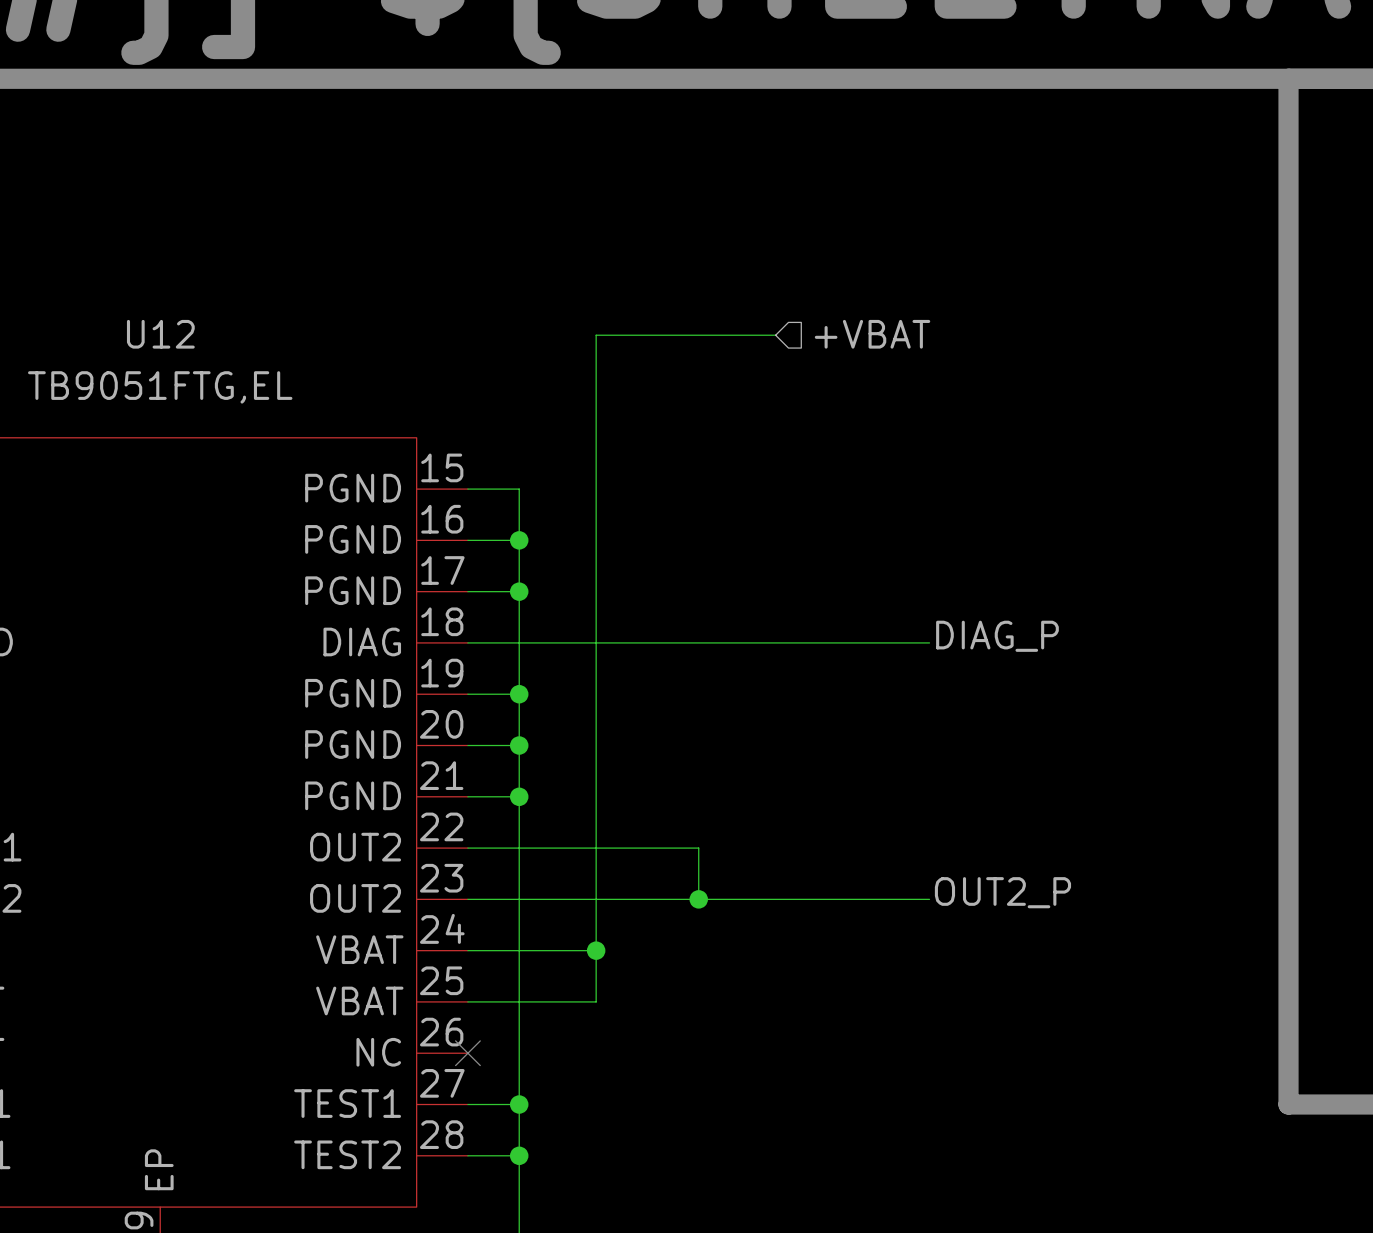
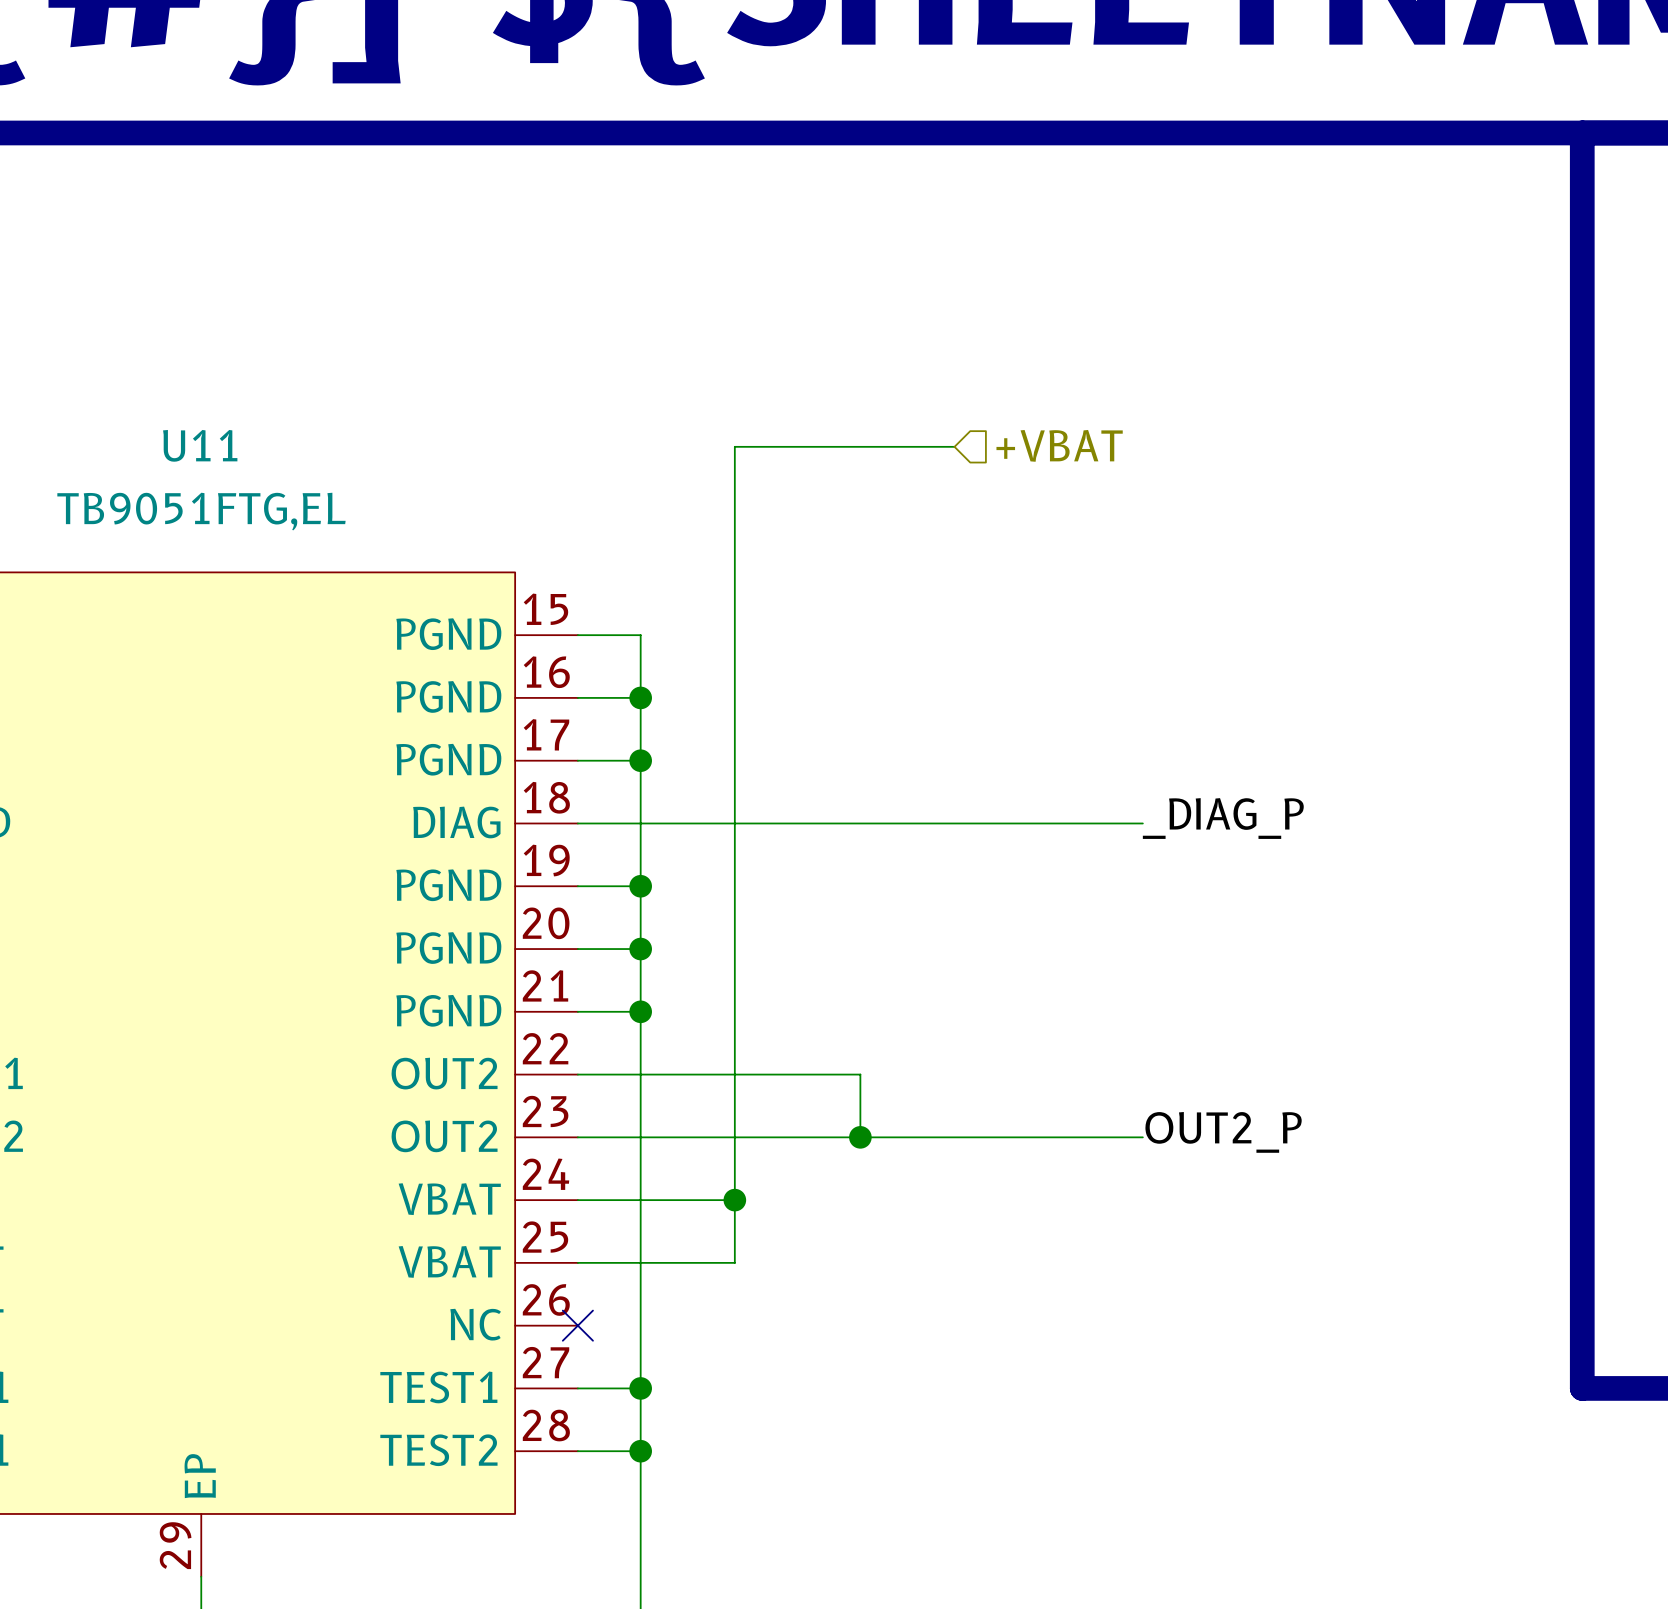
U12 name: U12 (160, 334) -> U11 (200, 445)
label: DIAG_P (997, 636) -> _DIAG_P (1223, 818)

